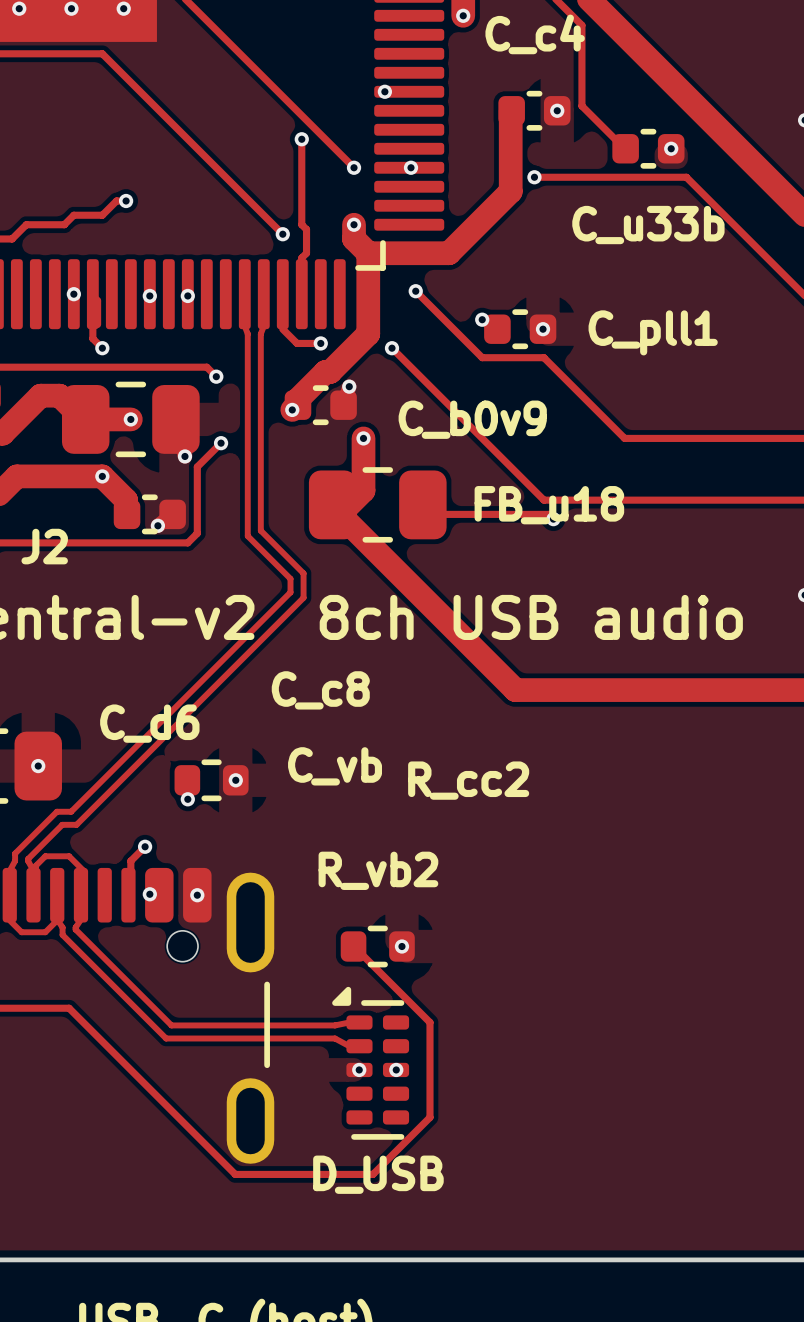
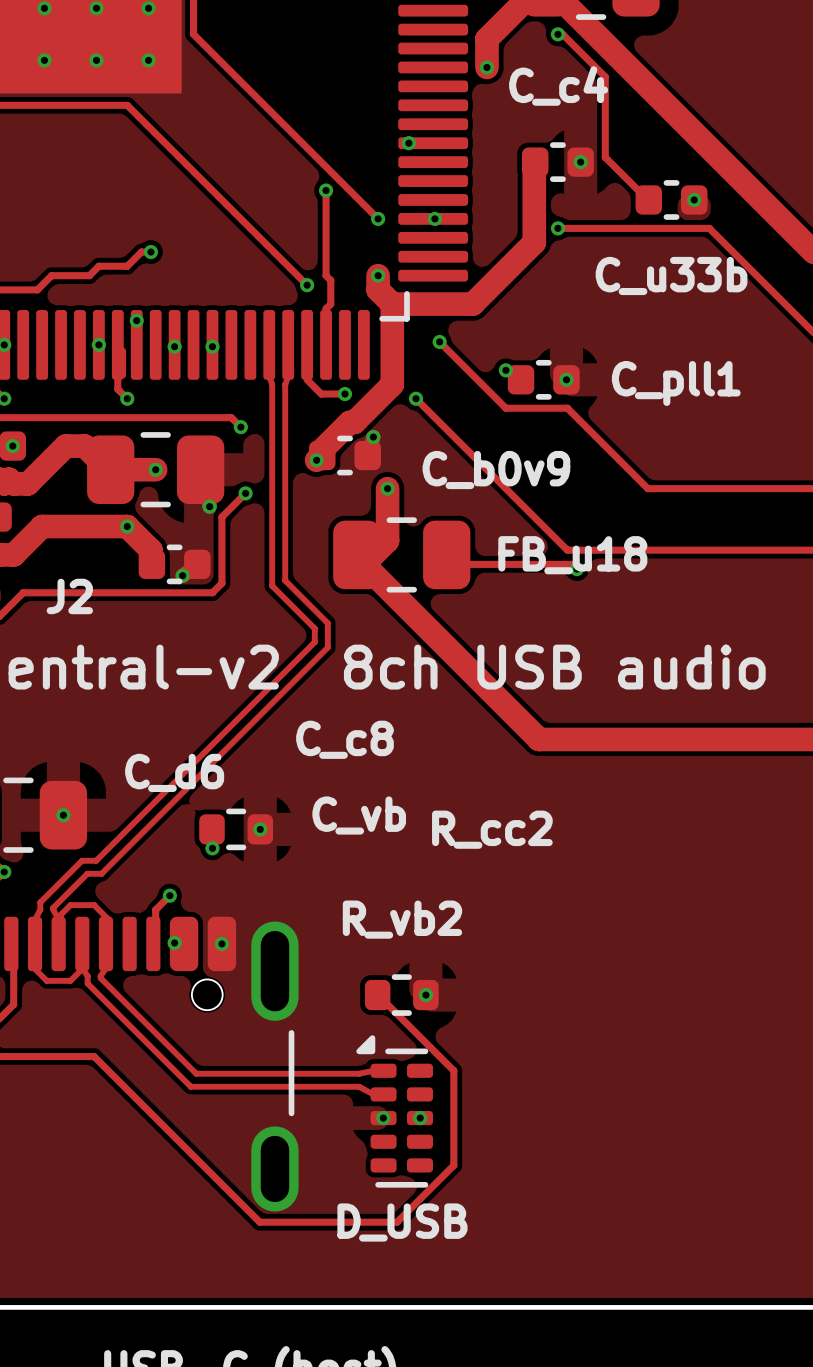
via: none -> (136, 320)

